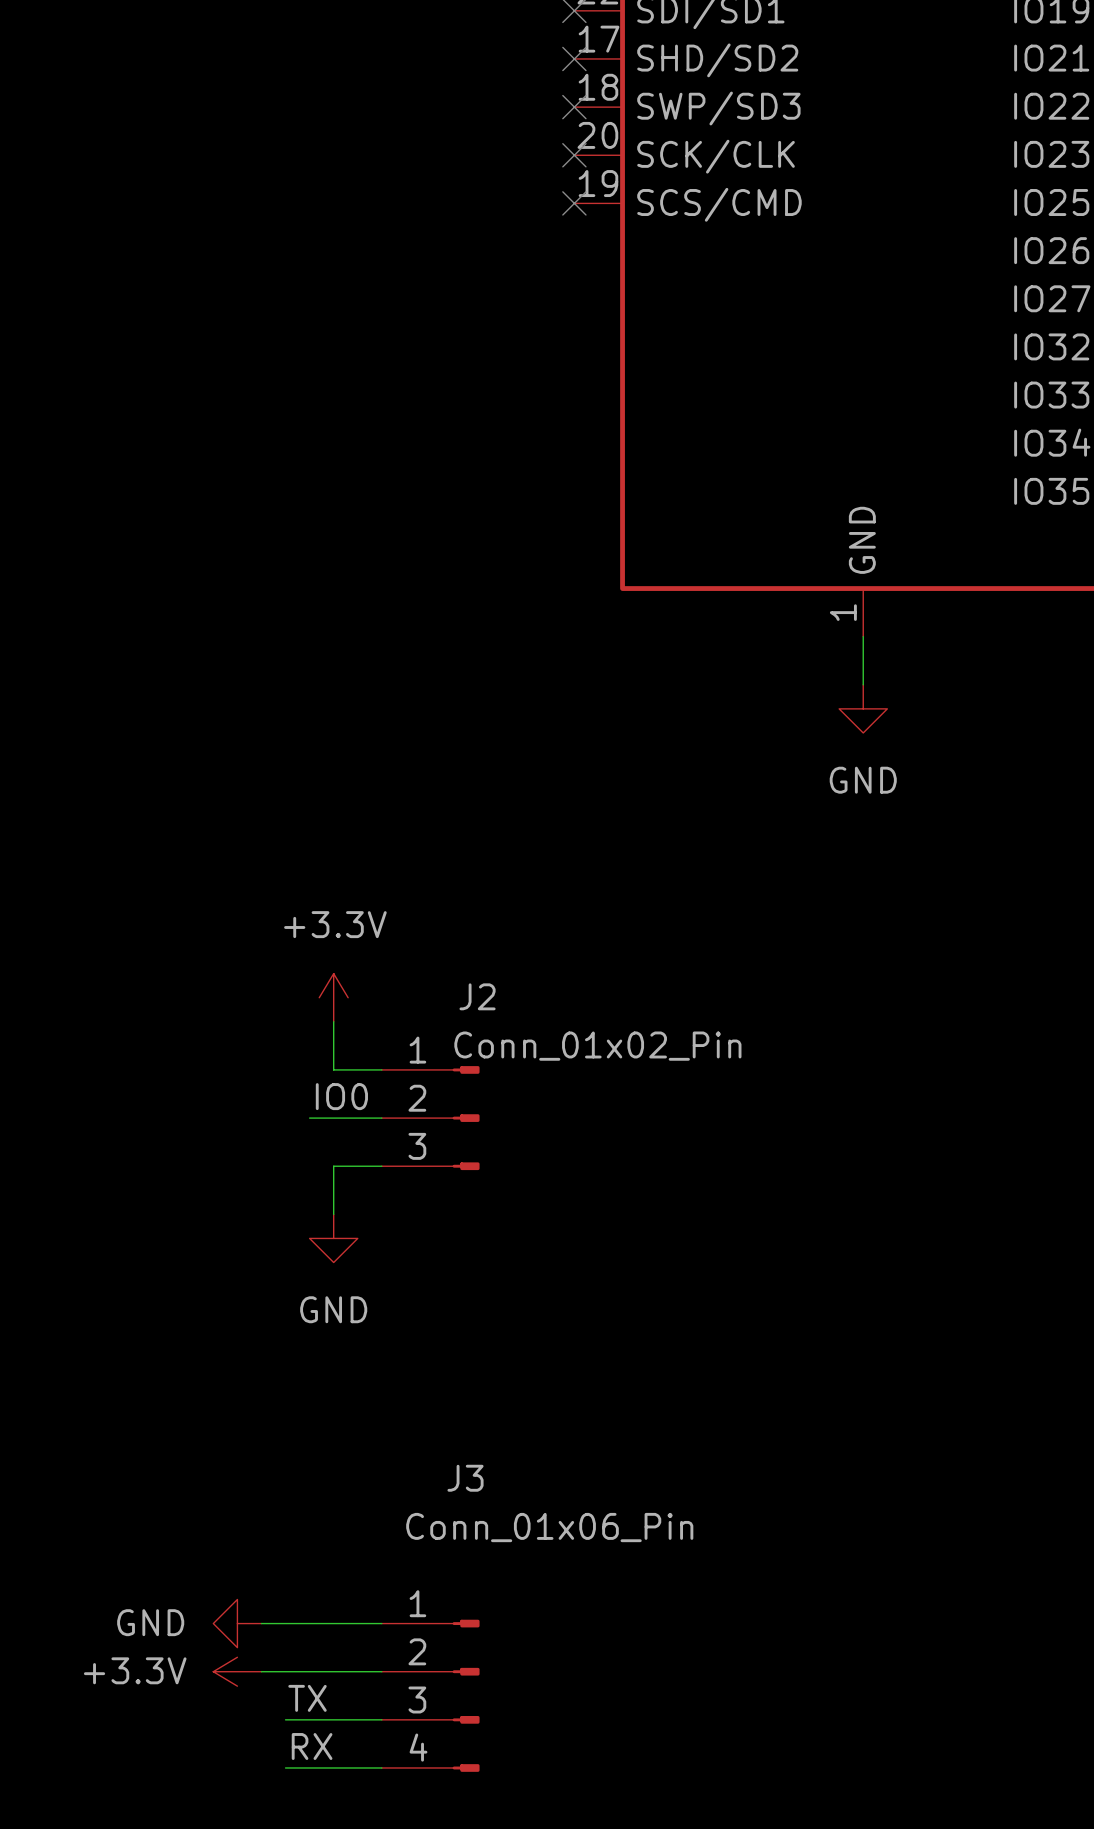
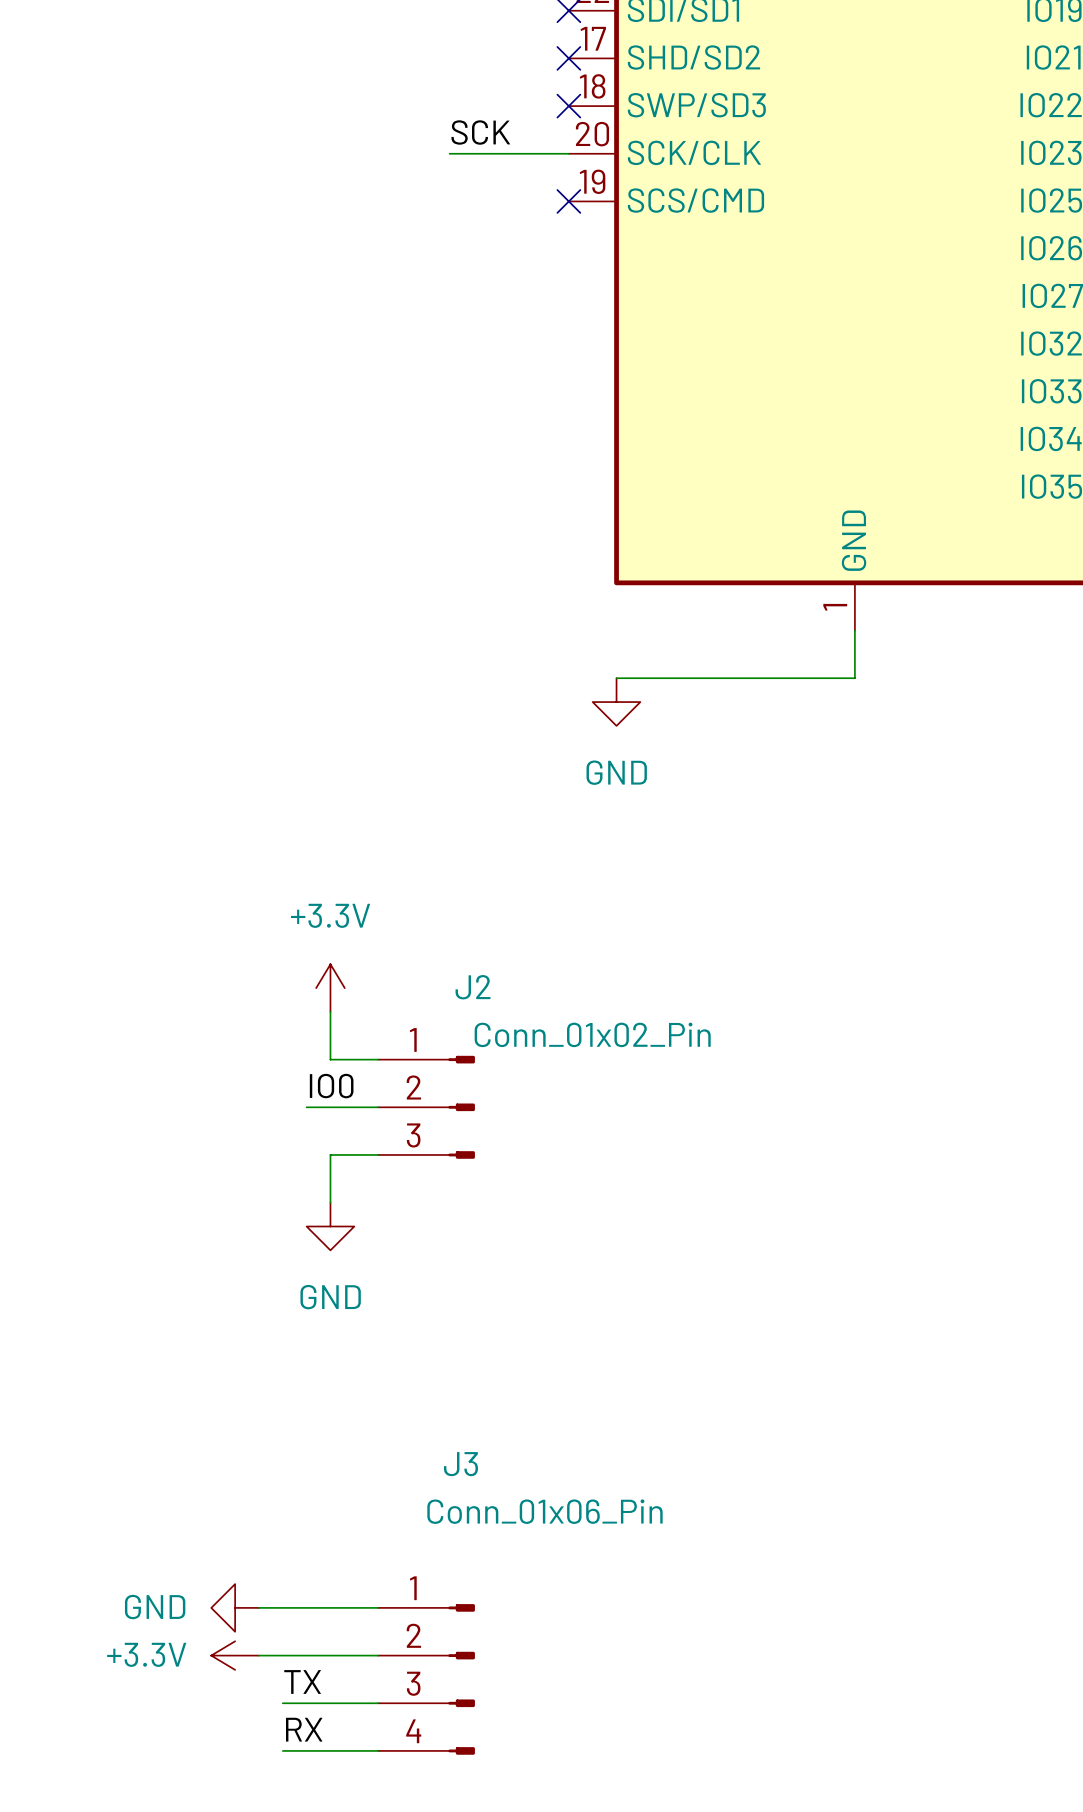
label: none -> SCK (480, 132)
wire: none -> (449, 153) (568, 153)
no-connect mark: (574, 155) -> none
wire: none -> (616, 678) (854, 678)
power symbol position: GND (863, 708) -> GND (616, 702)

